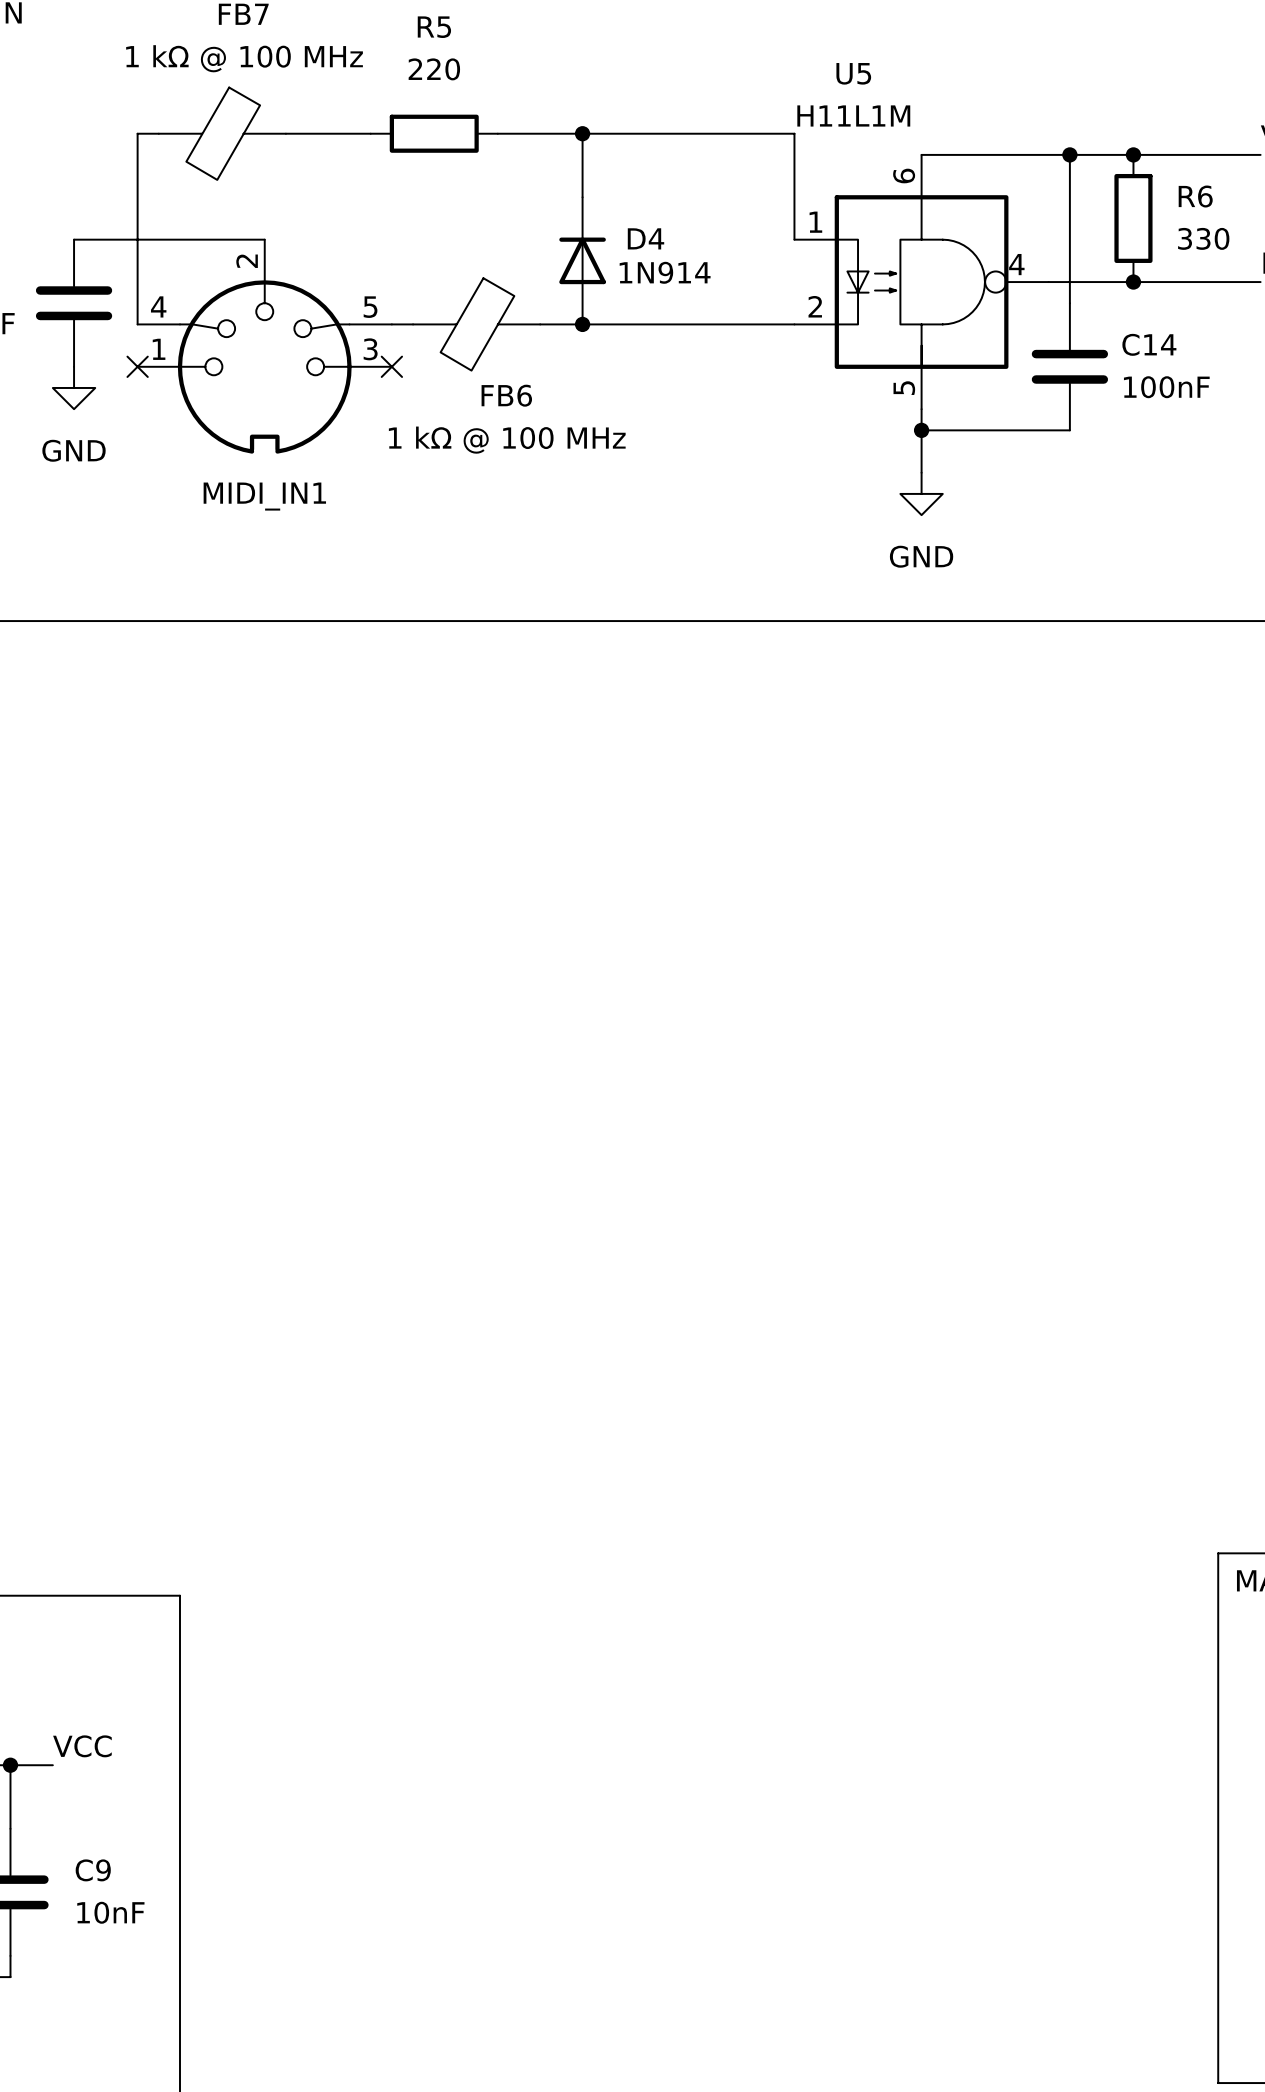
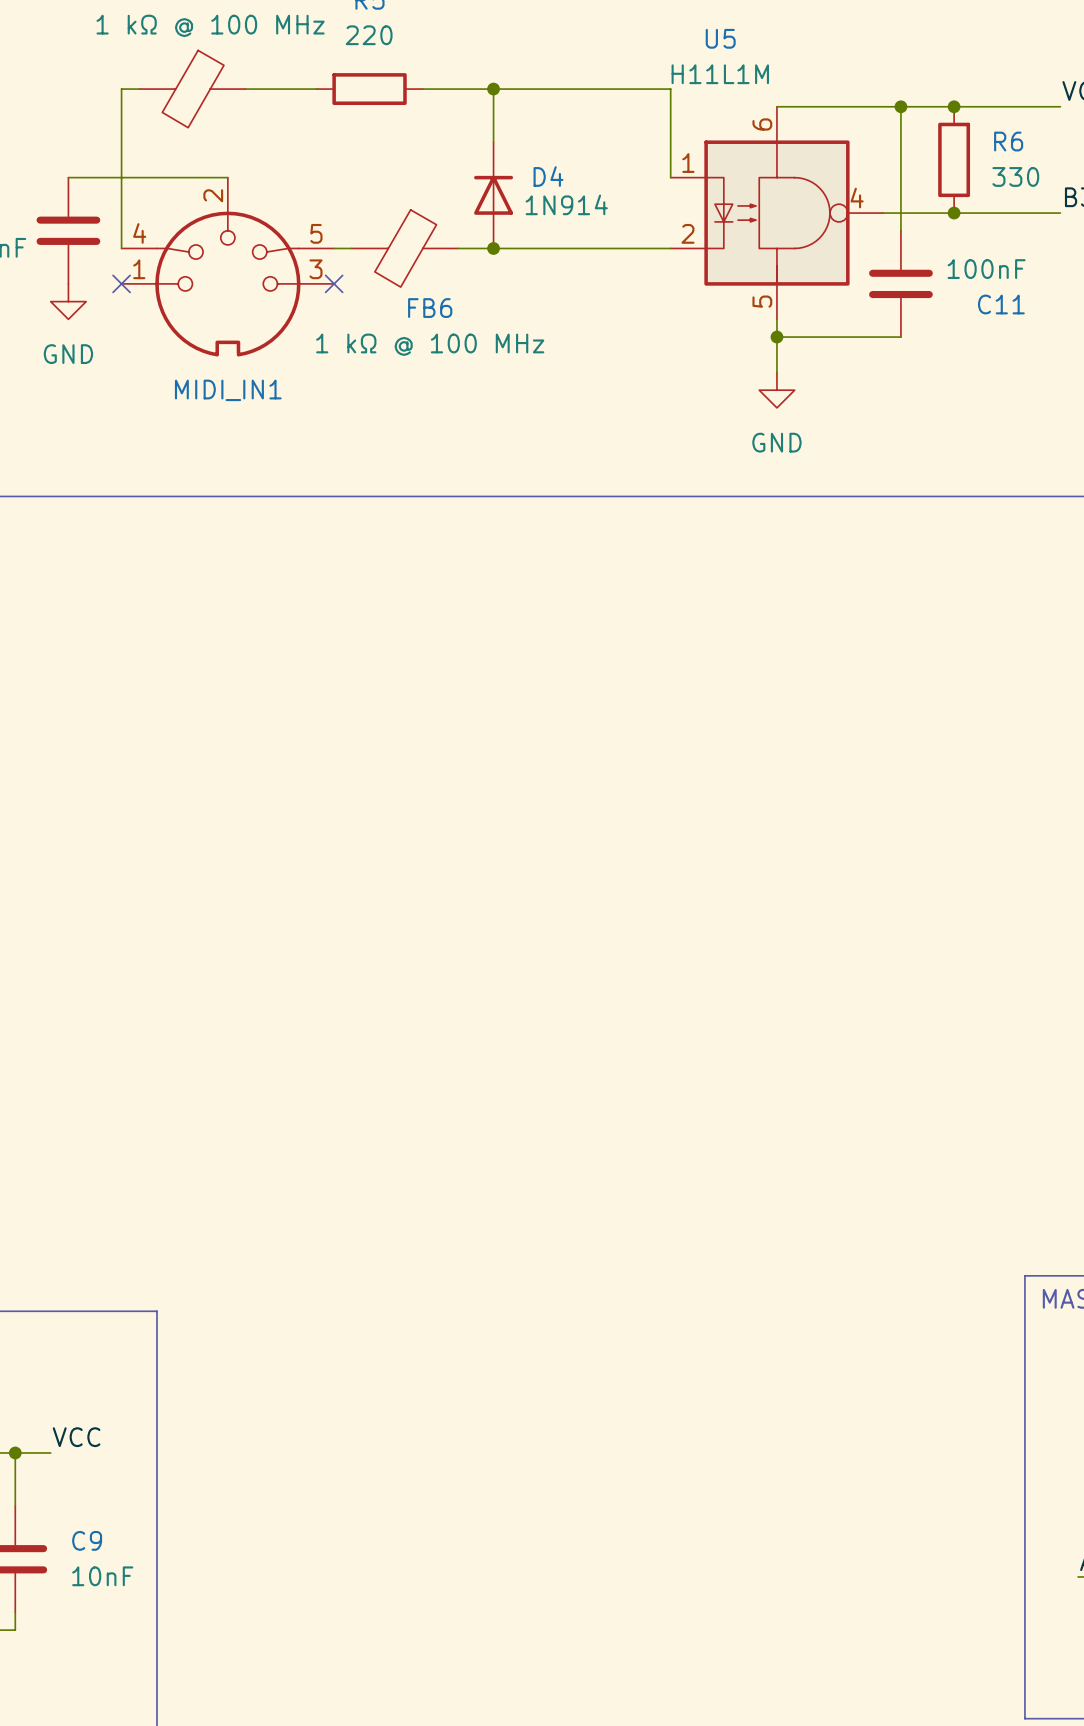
C14 name: C14 (1149, 344) -> C11 (1001, 304)
C14 value position: 100nF (1166, 387) -> 100nF (986, 269)

